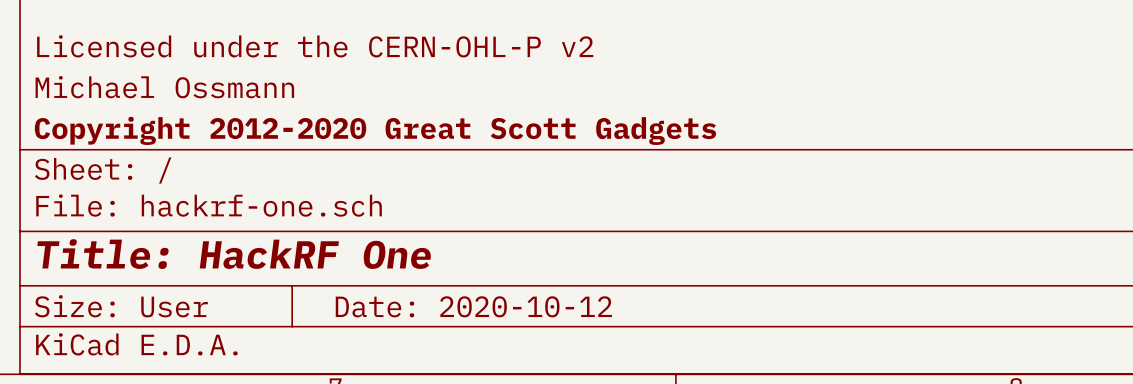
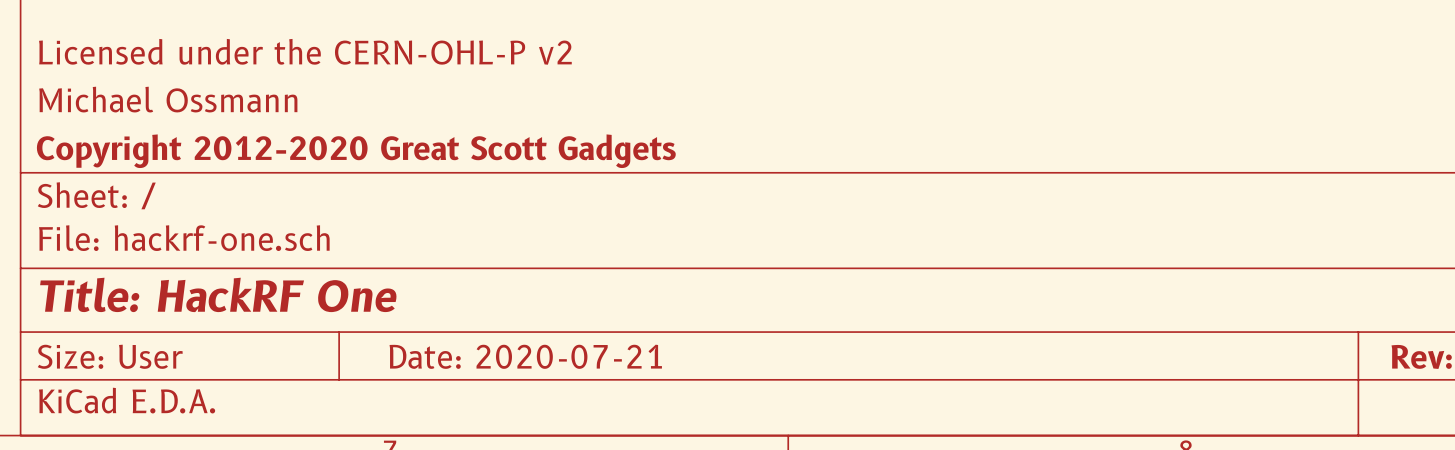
title block: Date: 2020-10-12 (473, 306) -> Date: 2020-07-21 (525, 356)

